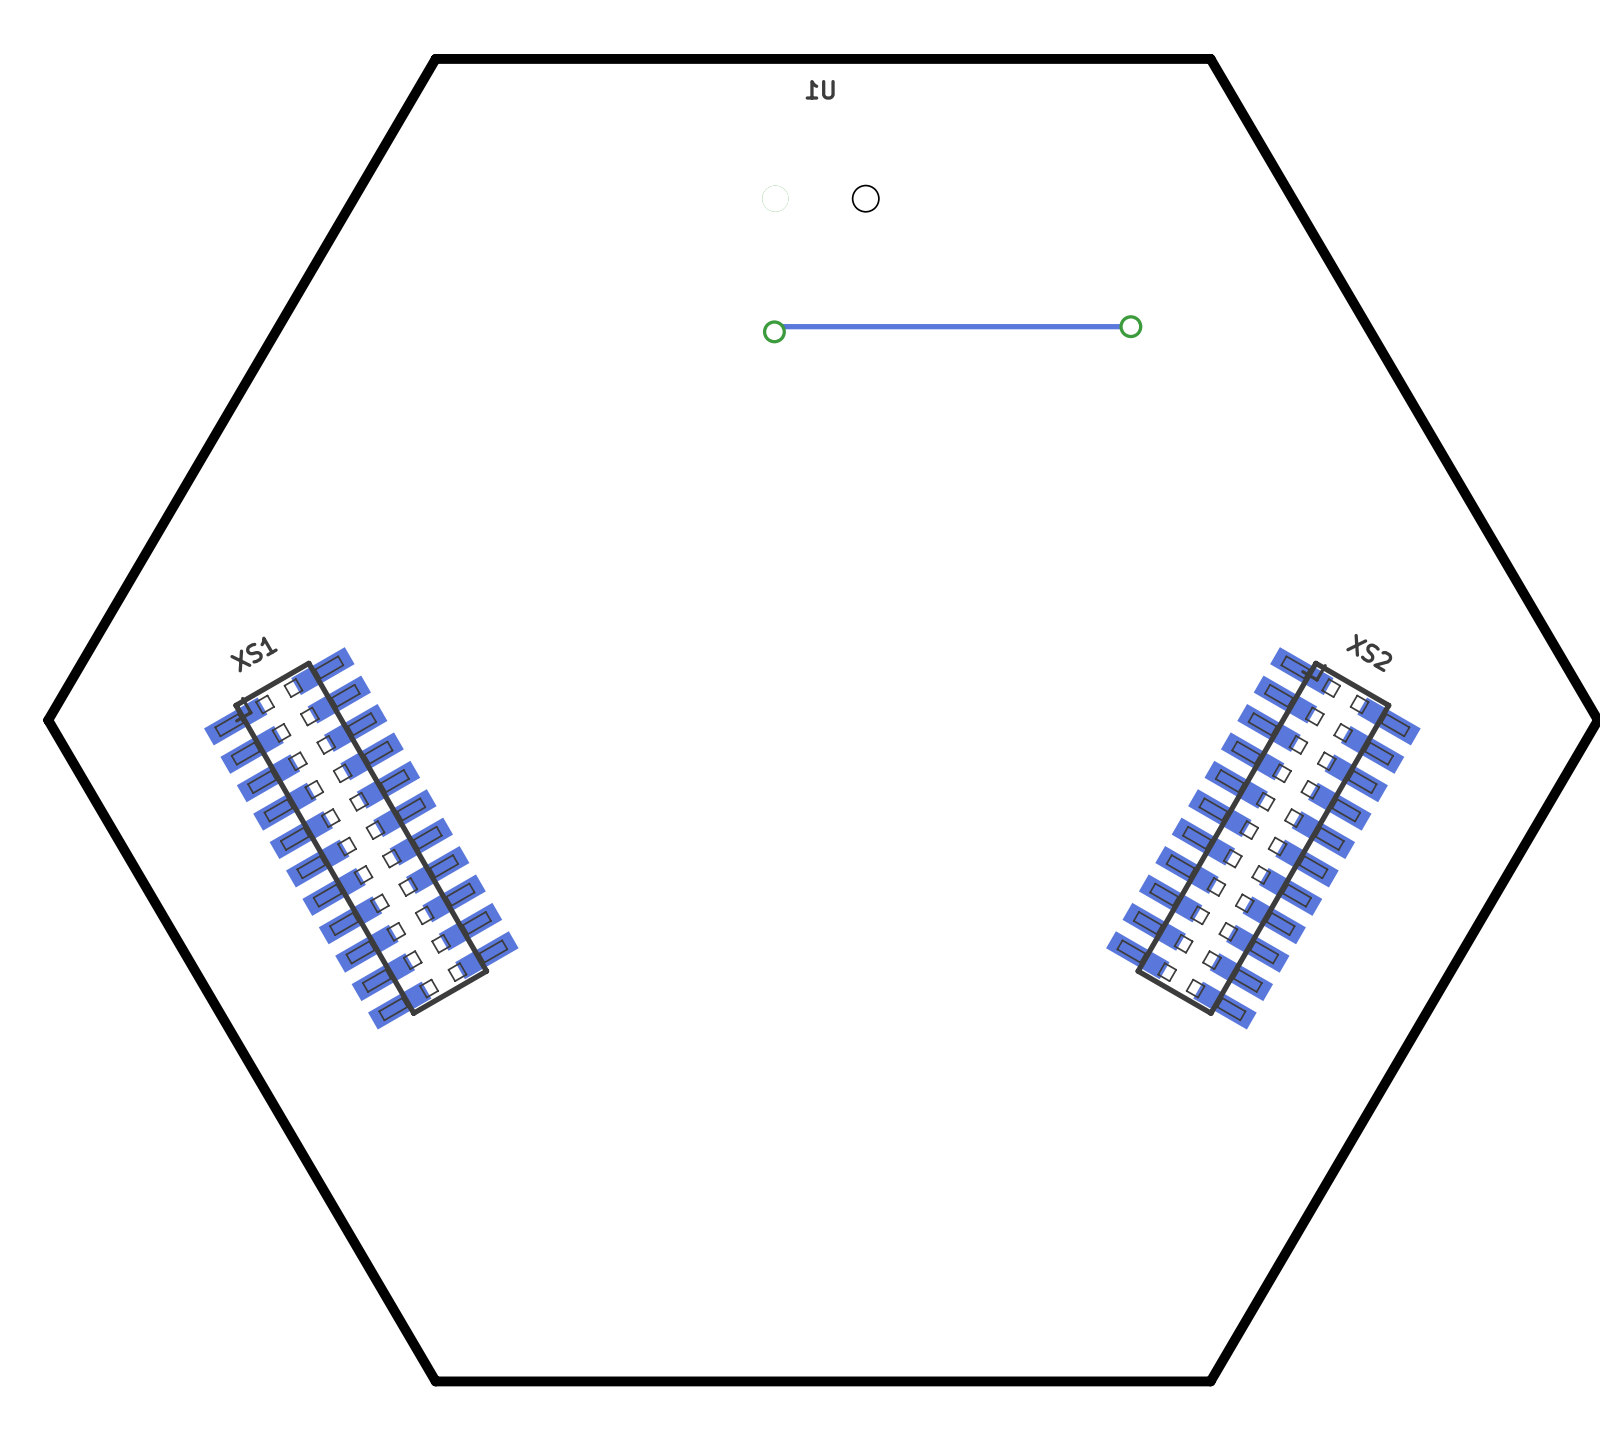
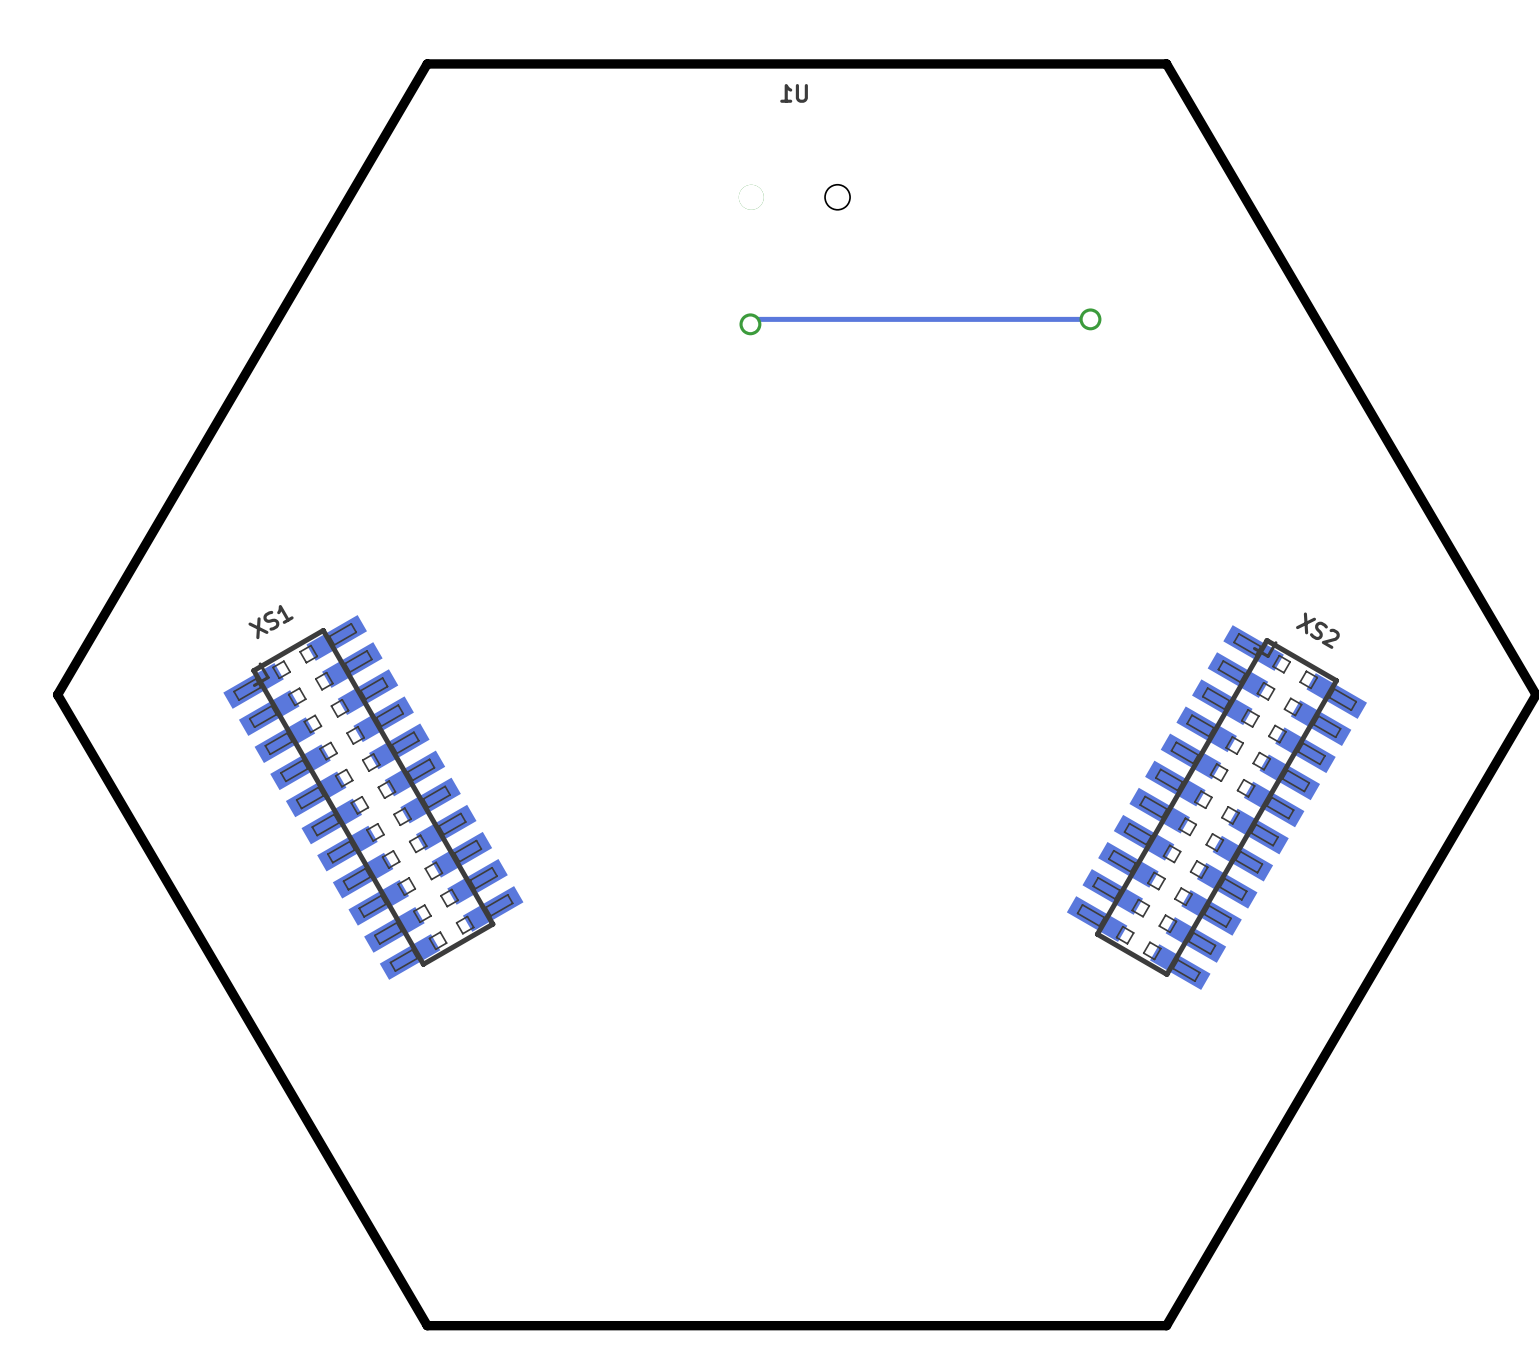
XS1 position: (361, 838) -> (373, 797)

